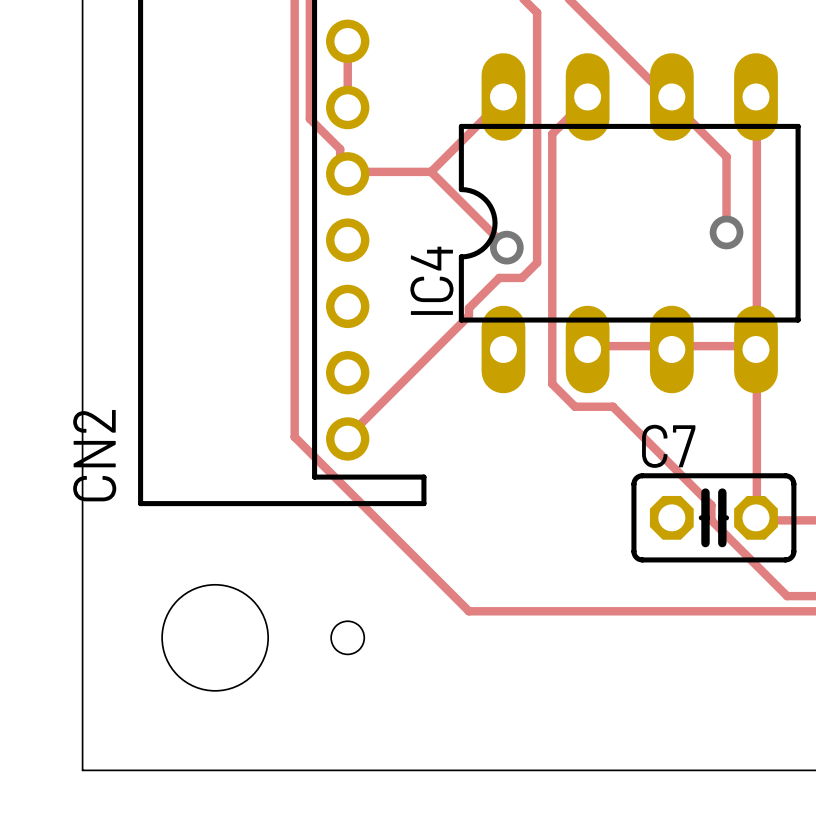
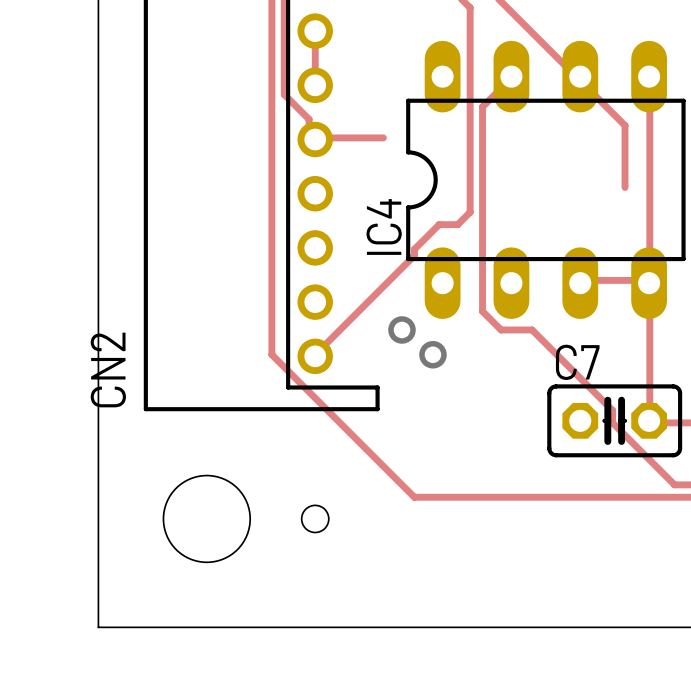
track: (503, 96) (499, 103) (431, 171) (506, 247) -> none
via: (726, 232) -> none
via: (506, 247) -> none
track: (587, 349) (590, 346) (665, 346) (671, 349) -> none
via: none -> (401, 329)
via: none -> (432, 354)

